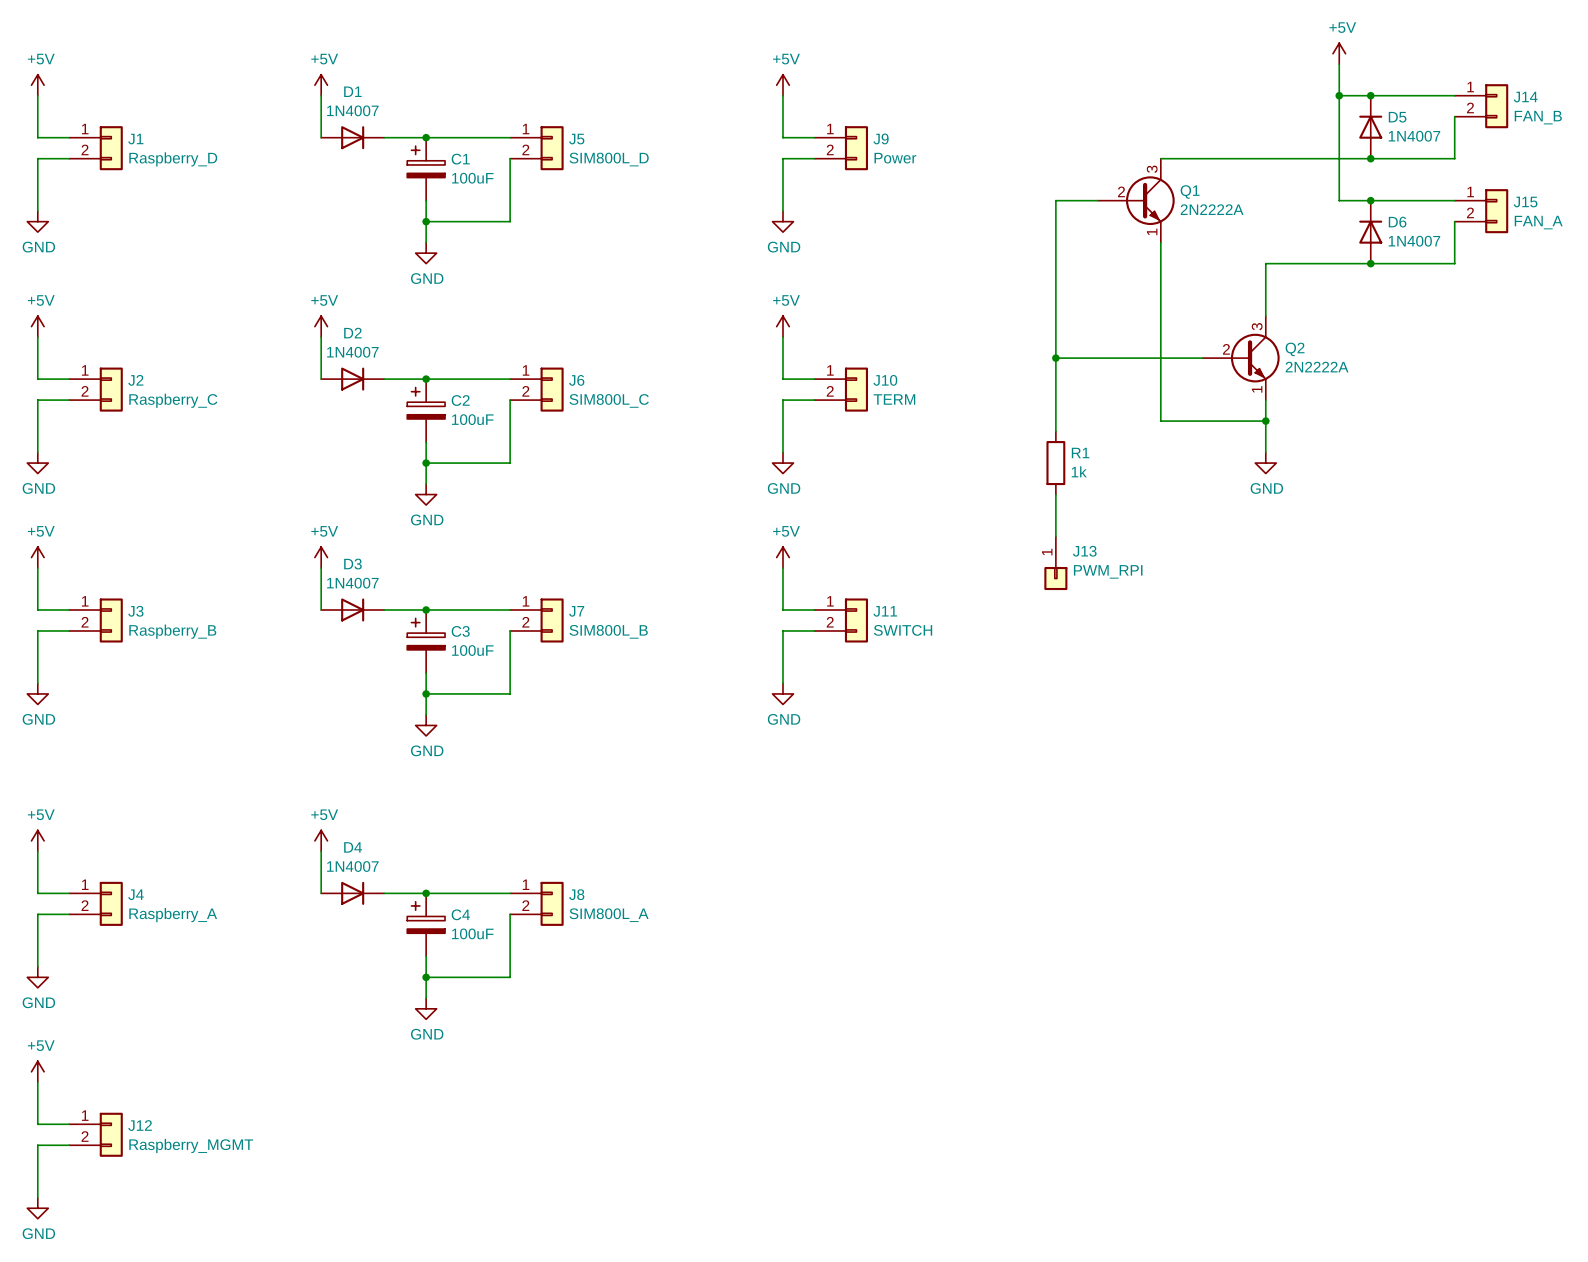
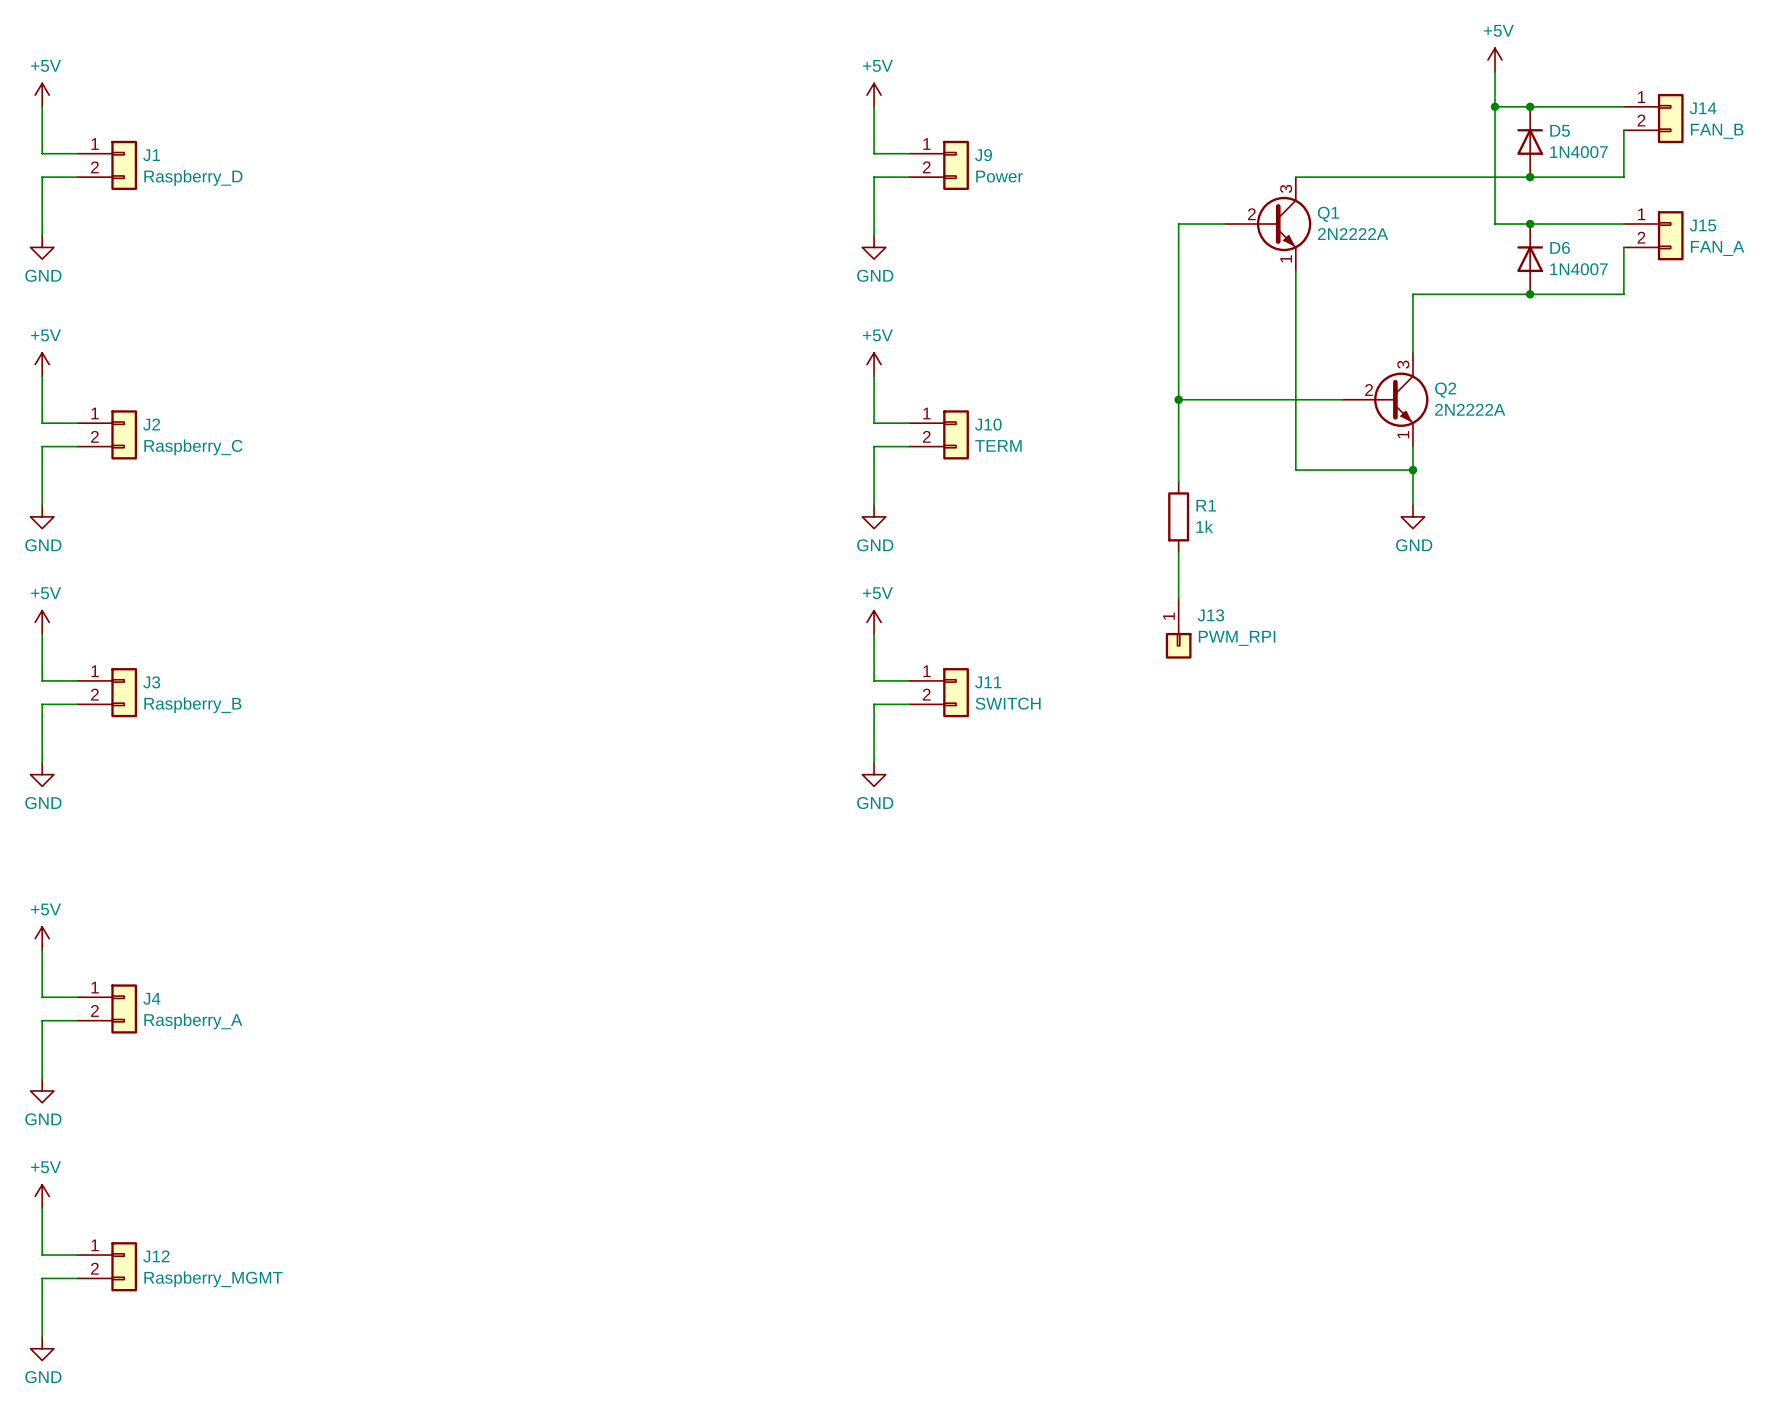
power symbol: +5V (321, 85) -> none
wire: (321, 95) (321, 137) -> none
D1: 1N4007 (352, 137) -> none
wire: (384, 137) (510, 137) -> none
junction: (426, 137) -> none
J5: SIM800L_D (536, 148) -> none
wire: (510, 158) (510, 221) (426, 221) -> none
C1: 100uF (426, 169) -> none
wire: (426, 200) (426, 242) -> none
junction: (426, 221) -> none
power symbol: GND (426, 253) -> none
power symbol: +5V (321, 326) -> none
wire: (321, 337) (321, 379) -> none
D2: 1N4007 (352, 379) -> none
wire: (384, 379) (510, 379) -> none
junction: (426, 379) -> none
J6: SIM800L_C (536, 389) -> none
wire: (510, 400) (510, 463) (426, 463) -> none
C2: 100uF (426, 410) -> none
wire: (426, 442) (426, 484) -> none
junction: (426, 463) -> none
power symbol: GND (426, 494) -> none
power symbol: +5V (321, 557) -> none
wire: (321, 568) (321, 609) -> none
D3: 1N4007 (352, 609) -> none
wire: (384, 609) (510, 609) -> none
junction: (426, 609) -> none
J7: SIM800L_B (536, 620) -> none
wire: (510, 630) (510, 693) (426, 693) -> none
C3: 100uF (426, 641) -> none
wire: (426, 672) (426, 714) -> none
junction: (426, 693) -> none
power symbol: GND (426, 725) -> none
power symbol: +5V (321, 840) -> none
wire: (321, 851) (321, 893) -> none
D4: 1N4007 (352, 893) -> none
wire: (384, 893) (510, 893) -> none
junction: (426, 893) -> none
J8: SIM800L_A (536, 903) -> none
wire: (510, 914) (510, 977) (426, 977) -> none
C4: 100uF (426, 924) -> none
wire: (426, 956) (426, 998) -> none
junction: (426, 977) -> none
power symbol: GND (426, 1008) -> none

